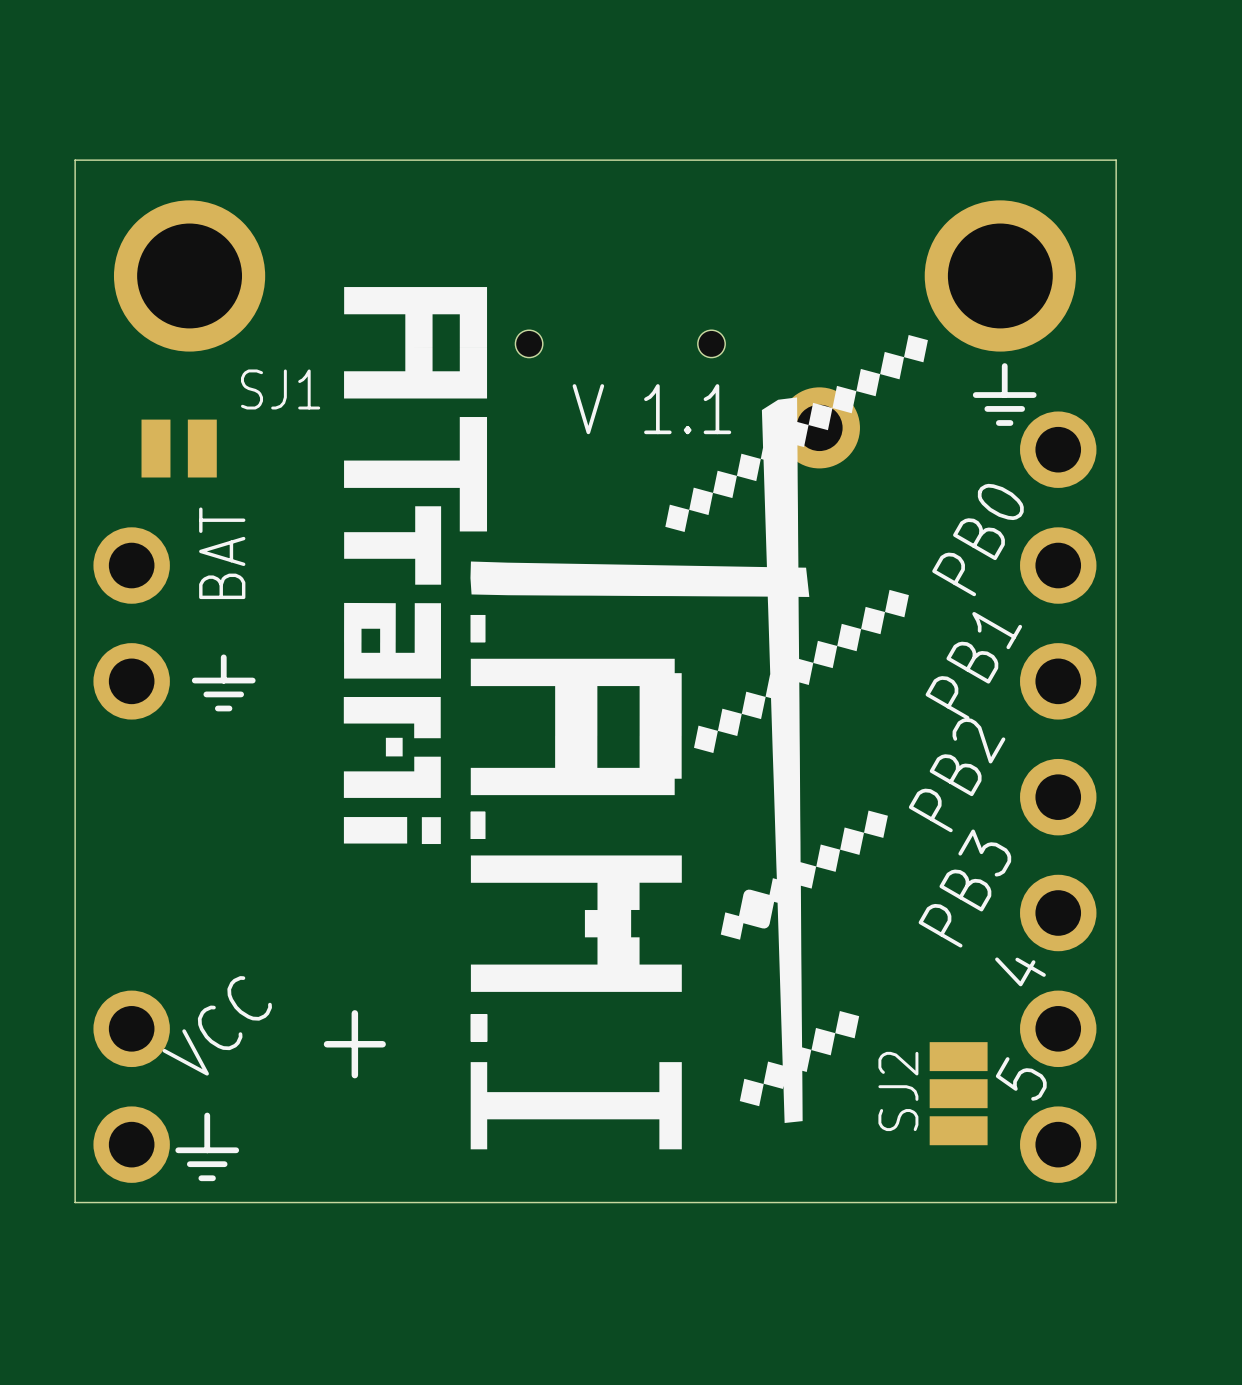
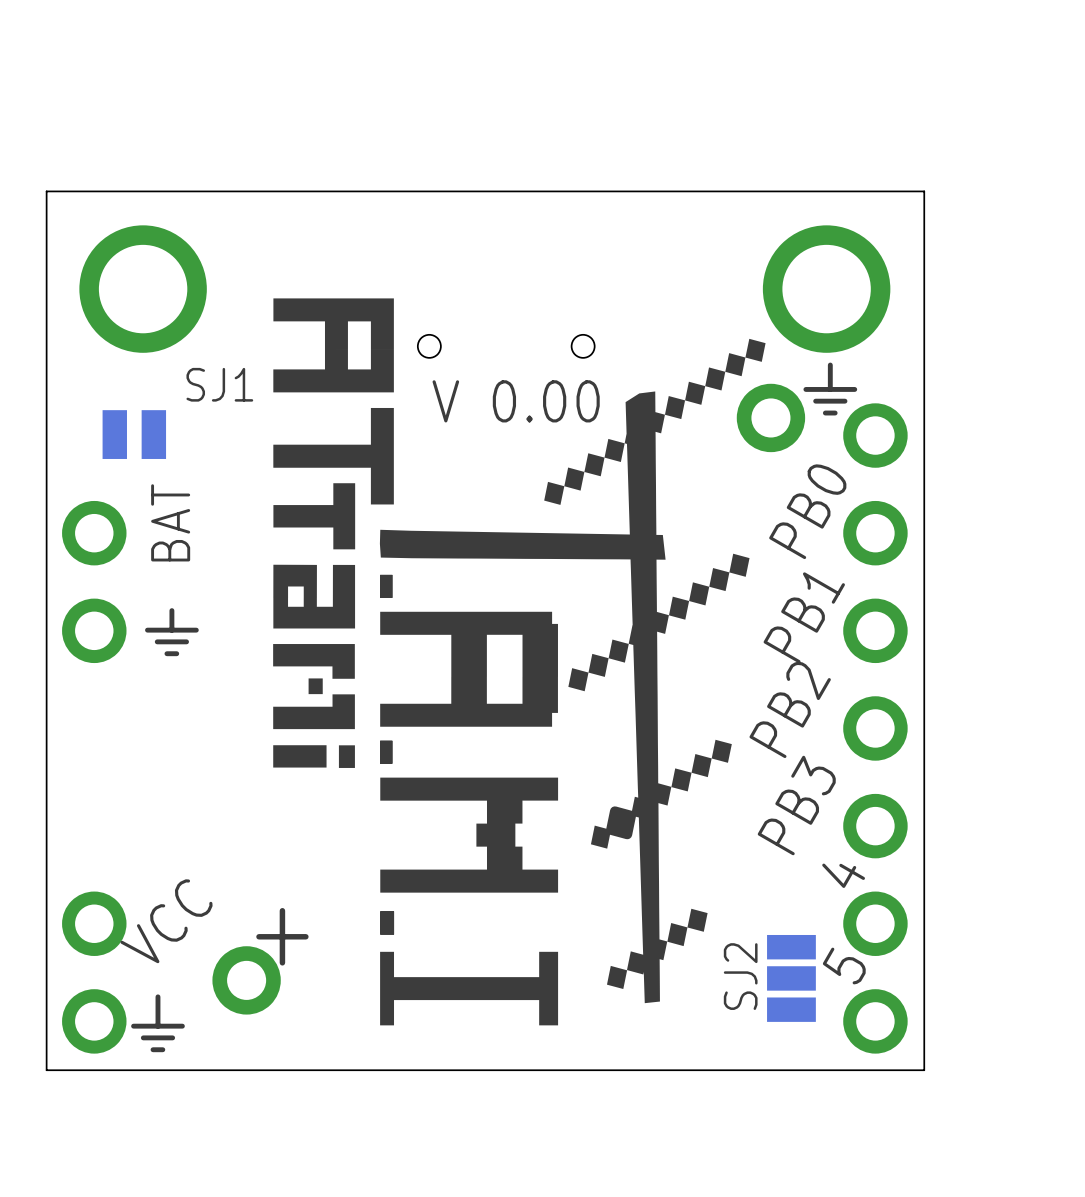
text: V 1.1 (651, 409) -> V 0.00 (516, 401)
part position: (819, 427) -> (770, 417)
part: none -> (246, 980)

